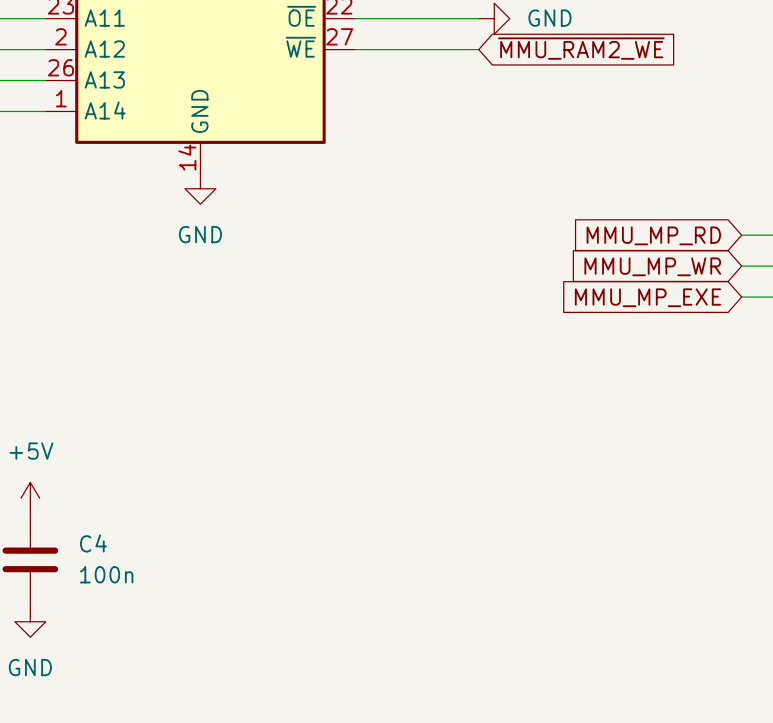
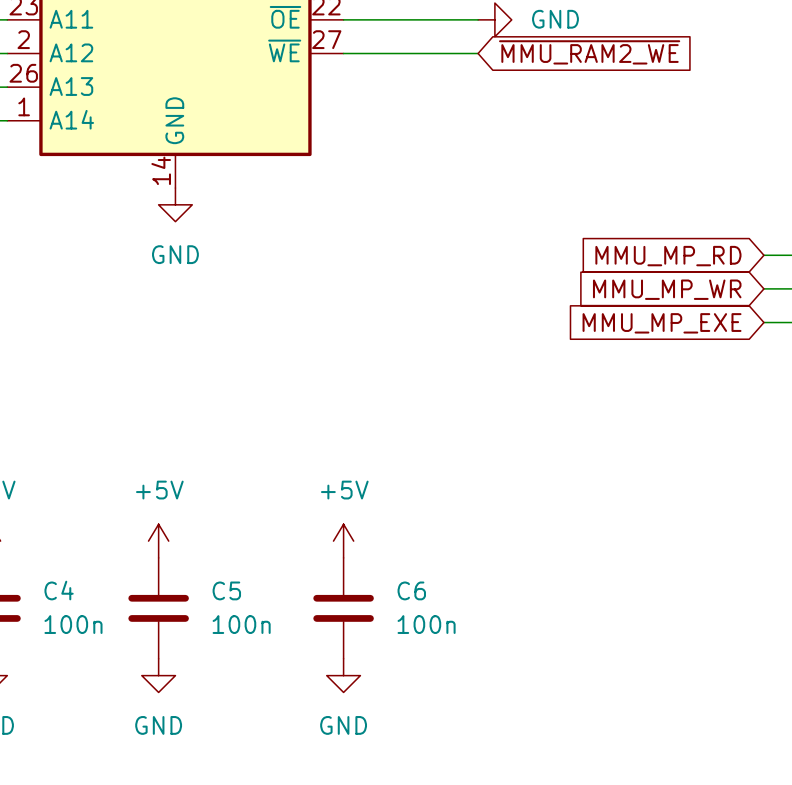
power symbol: none -> +5V (158, 541)
power symbol: none -> +5V (343, 541)
C5: none -> 100n (158, 608)
C6: none -> 100n (343, 608)
power symbol: none -> GND (158, 675)
power symbol: none -> GND (343, 675)

